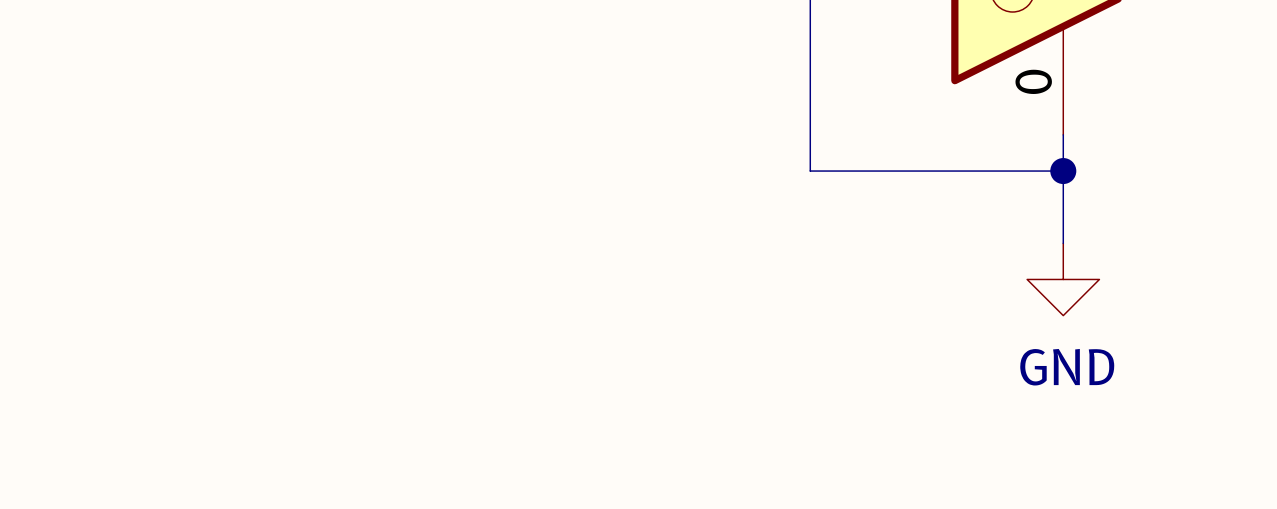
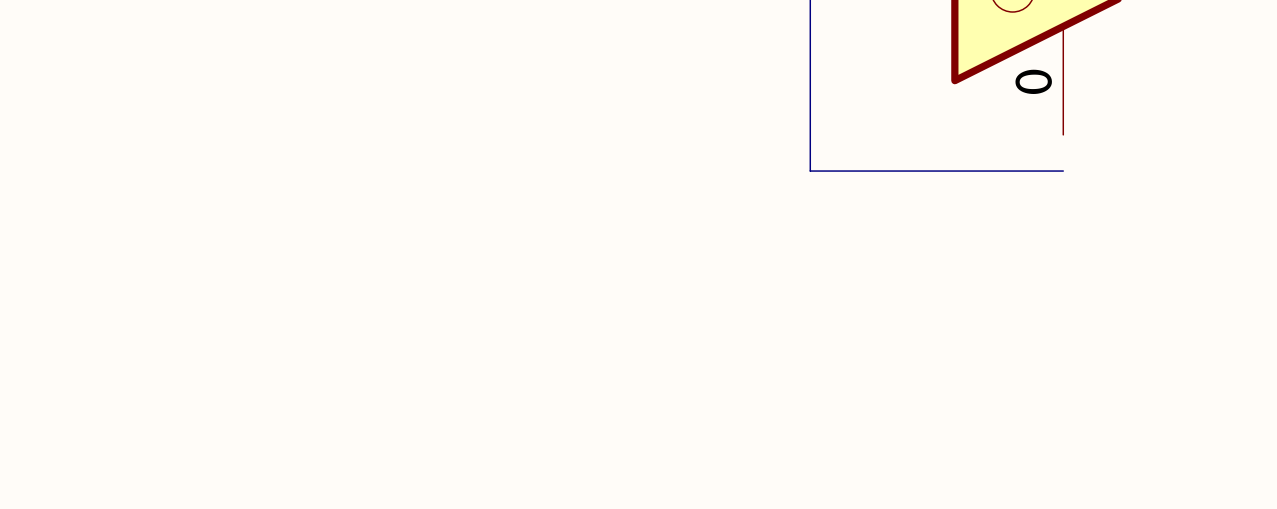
wire: (1063, 134) (1063, 243) -> none
junction: (1063, 171) -> none
power symbol: GND (1063, 279) -> none

